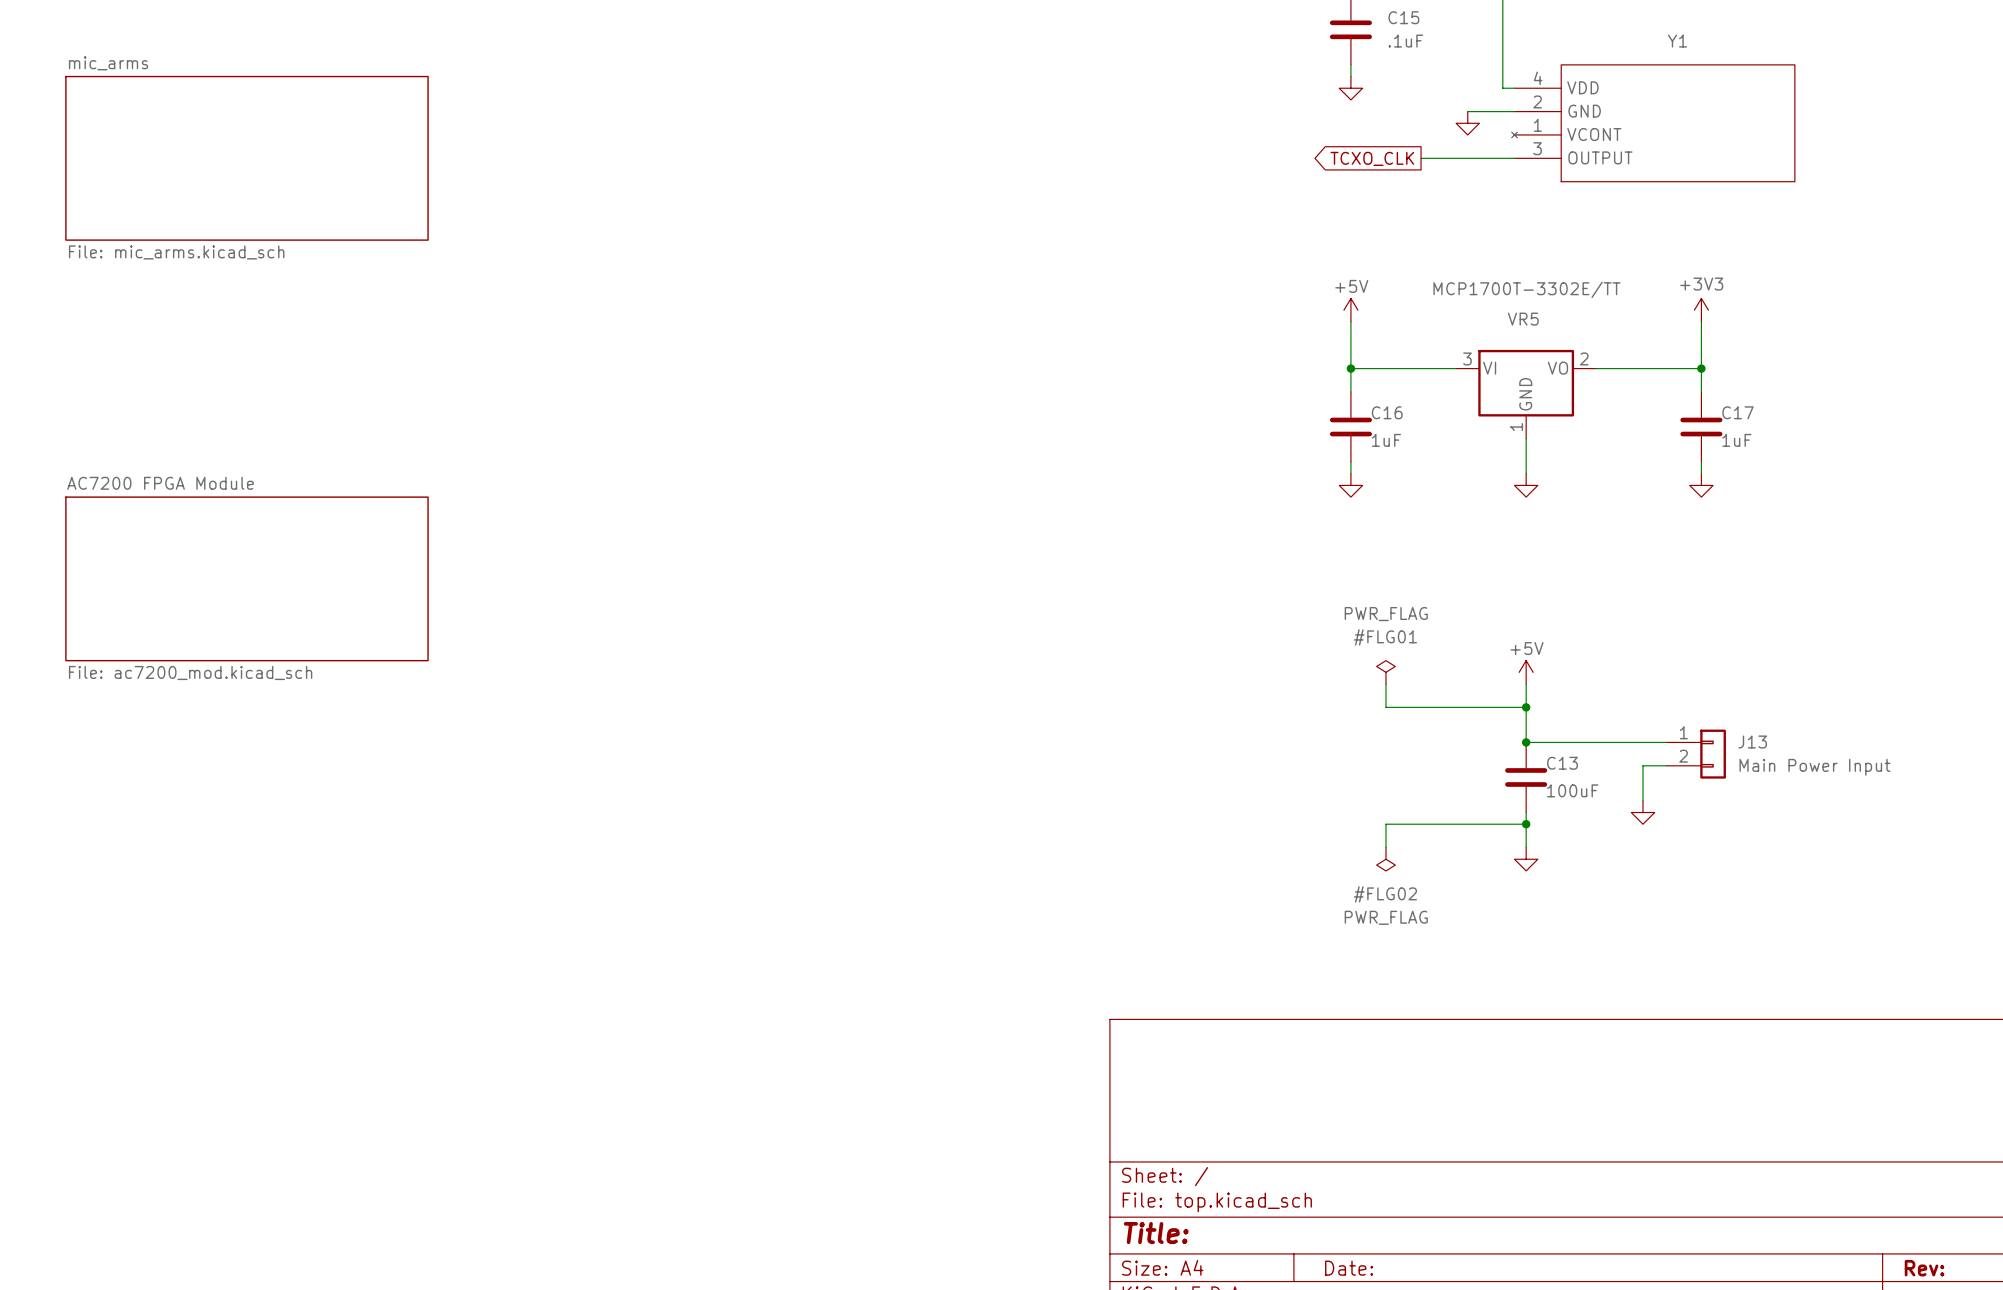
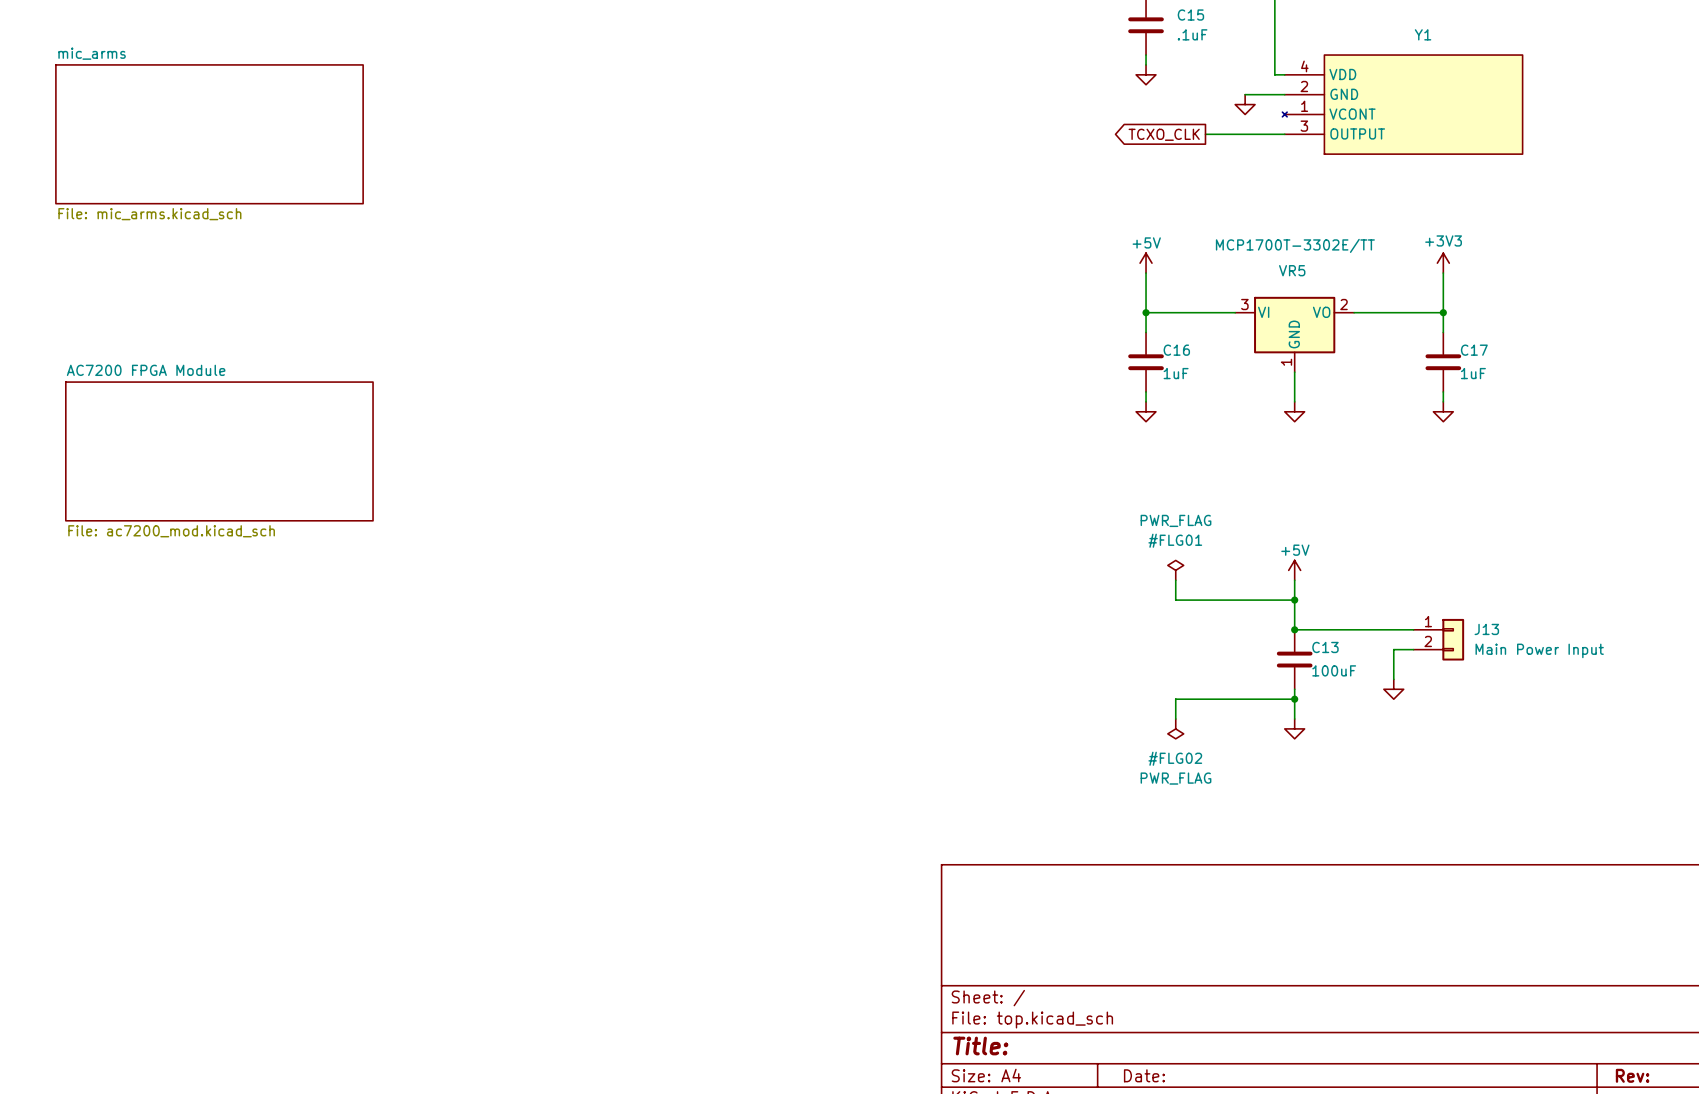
sheet AC7200 FPGA Module position: (246, 578) -> (219, 451)

